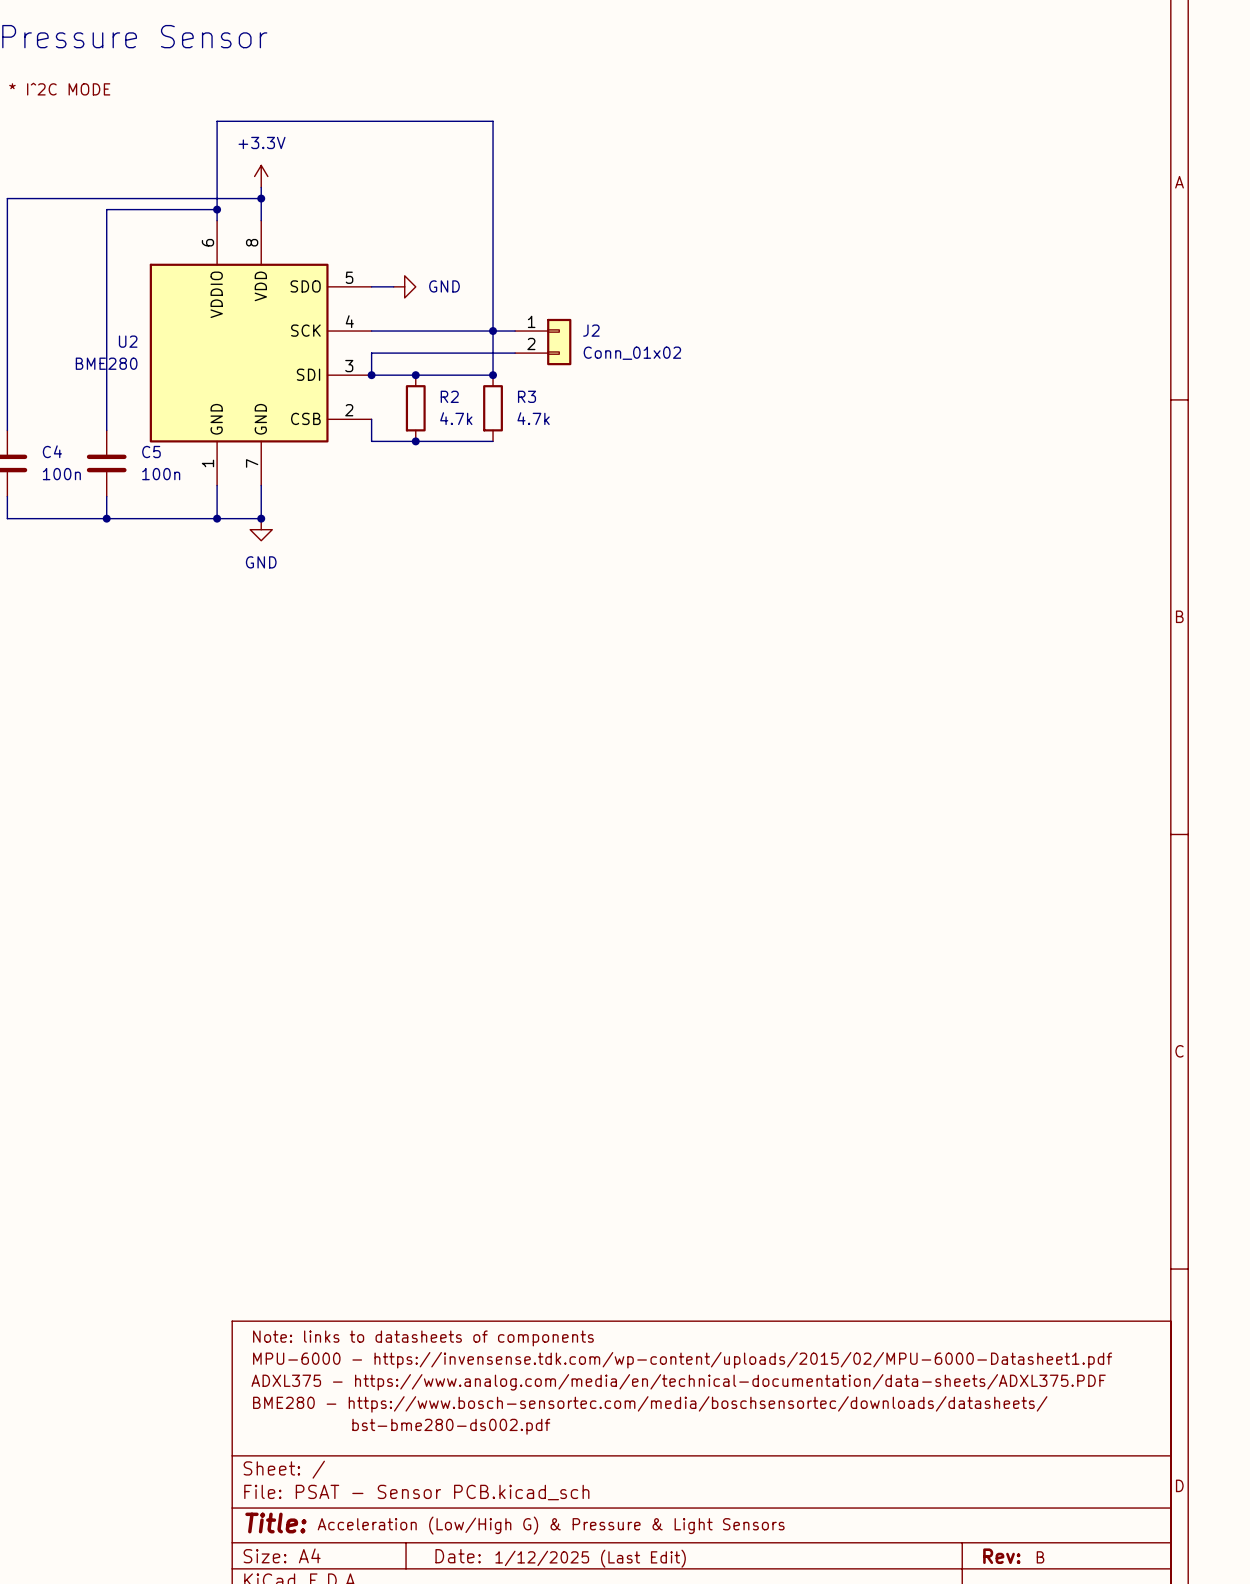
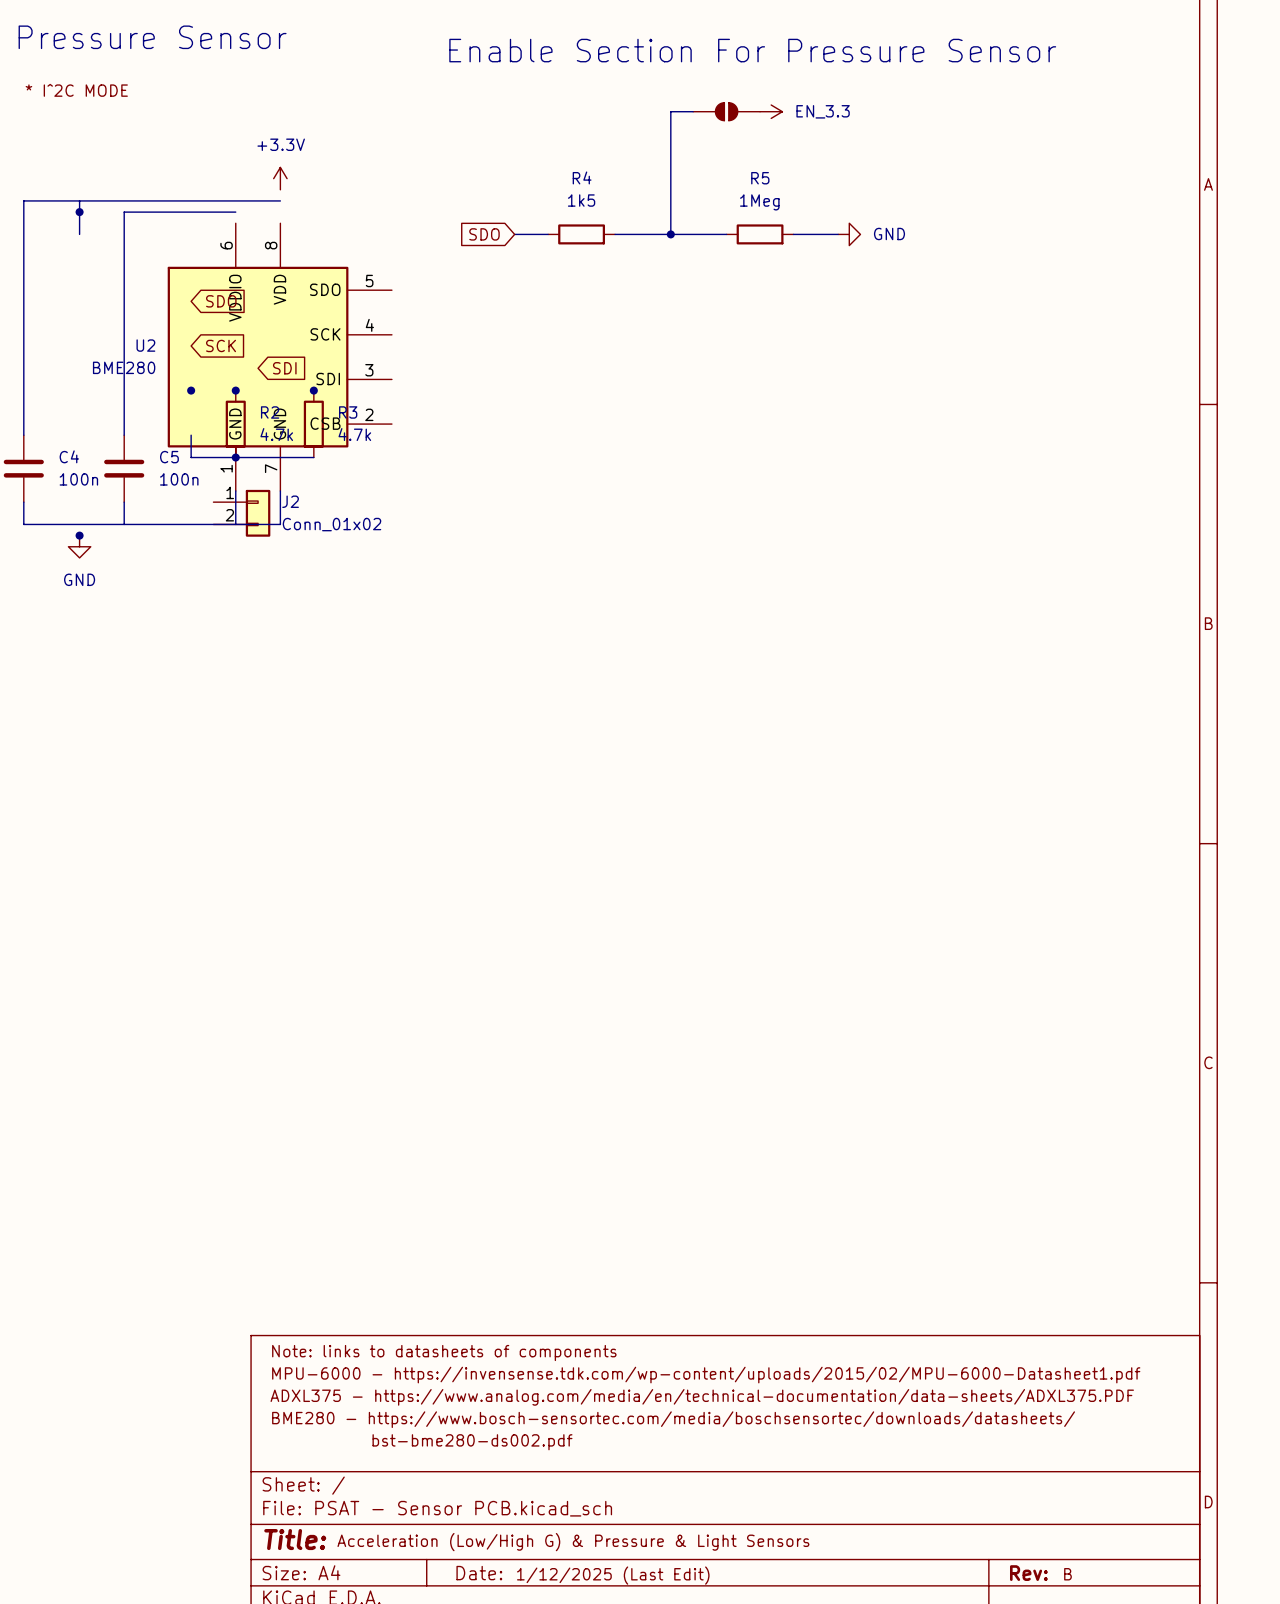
text: none -> Enable Section For Pressure Sensor (752, 50)
wire: none -> (693, 111) (670, 111) (670, 234)
part: none -> (726, 111)
power symbol: none -> EN_3.3 (771, 111)
wire: (261, 187) (261, 220) -> (79, 200) (79, 234)
junction: (261, 198) -> none
junction: none -> (79, 212)
junction: (217, 209) -> none
wire: (217, 220) (217, 121) (493, 121) (493, 375) (371, 375) (371, 353) (515, 353) -> none
global label: none -> SDO (484, 234)
wire: none -> (514, 234) (548, 234)
R4: none -> 1k5 (581, 234)
wire: none -> (615, 234) (726, 234)
junction: none -> (670, 234)
R5: none -> 1Meg (760, 234)
wire: none -> (793, 234) (838, 234)
power symbol: none -> GND (849, 234)
wire: (371, 286) (393, 286) -> none
power symbol: GND (404, 286) -> none
global label: none -> SDO (221, 301)
wire: (371, 331) (515, 331) -> none
junction: (493, 331) -> none
global label: none -> SCK (221, 345)
J2 position: (543, 342) -> (241, 513)
global label: none -> SDI (284, 368)
junction: (371, 375) -> none
junction: (415, 375) -> none
junction: (493, 375) -> none
junction: none -> (191, 390)
junction: none -> (235, 390)
junction: none -> (313, 390)
R2 position: (415, 408) -> (235, 424)
R3 position: (493, 408) -> (313, 424)
wire: (371, 419) (371, 441) (493, 441) -> (191, 435) (191, 457) (313, 457)
junction: (415, 441) -> none
junction: none -> (235, 457)
junction position: (106, 518) -> (79, 535)
junction: (217, 518) -> none
junction: (261, 518) -> none
power symbol position: GND (261, 529) -> GND (79, 546)

